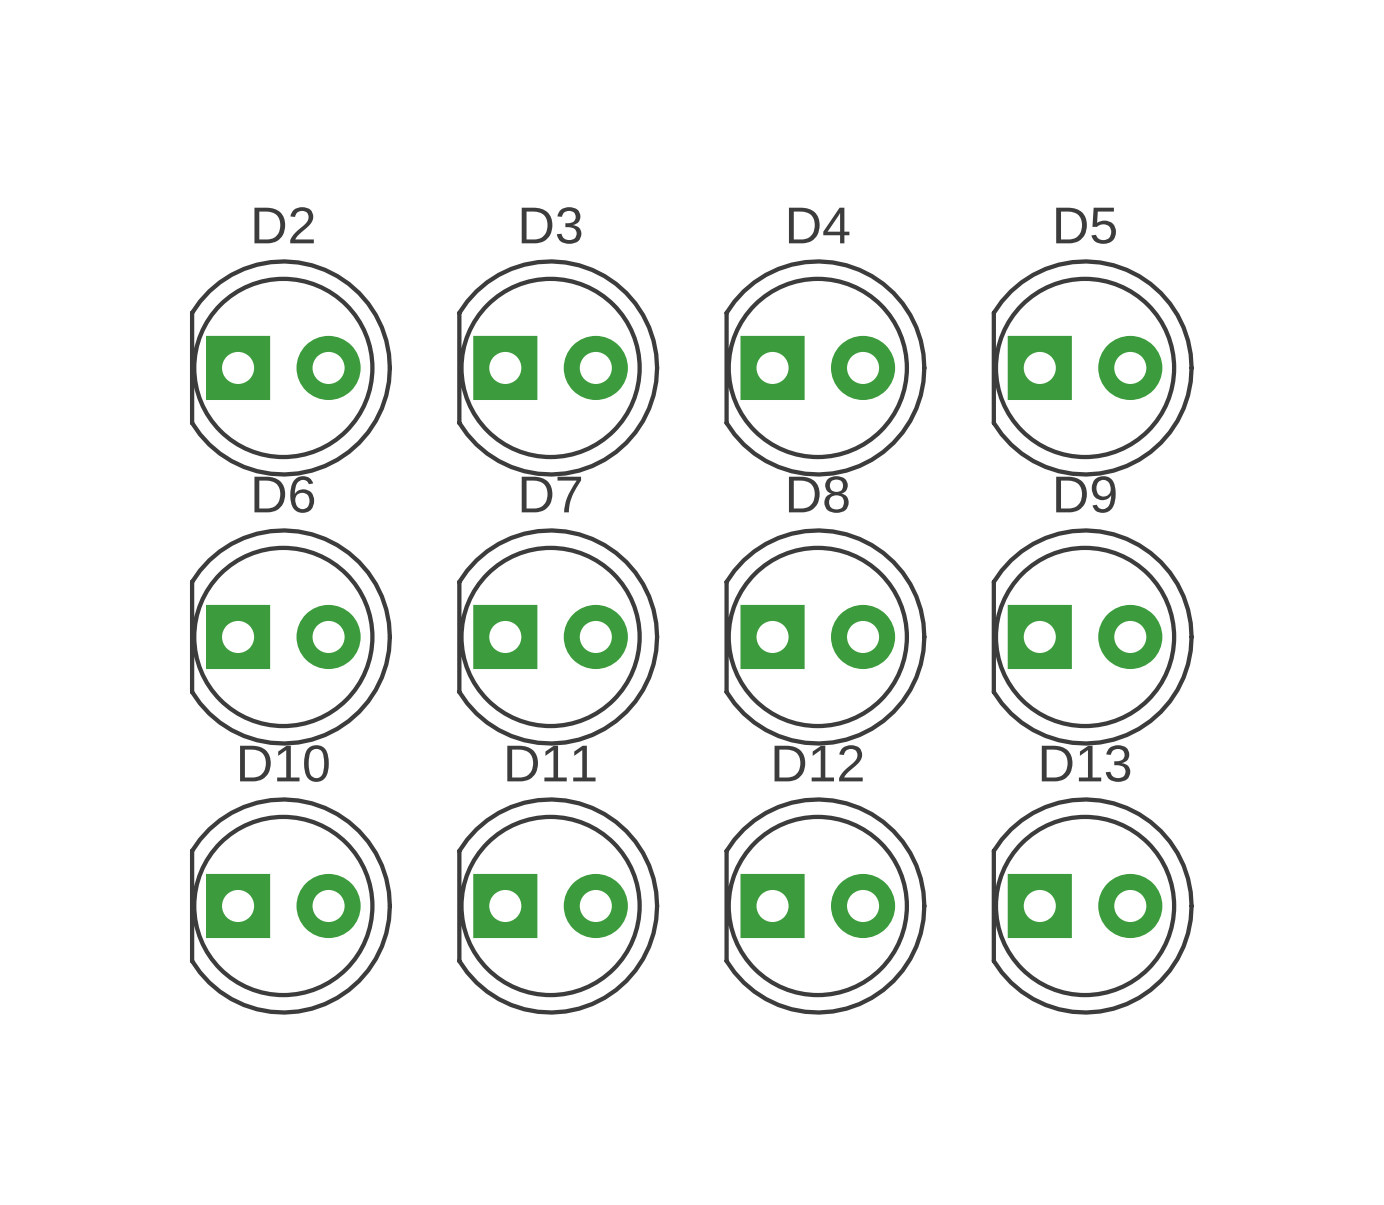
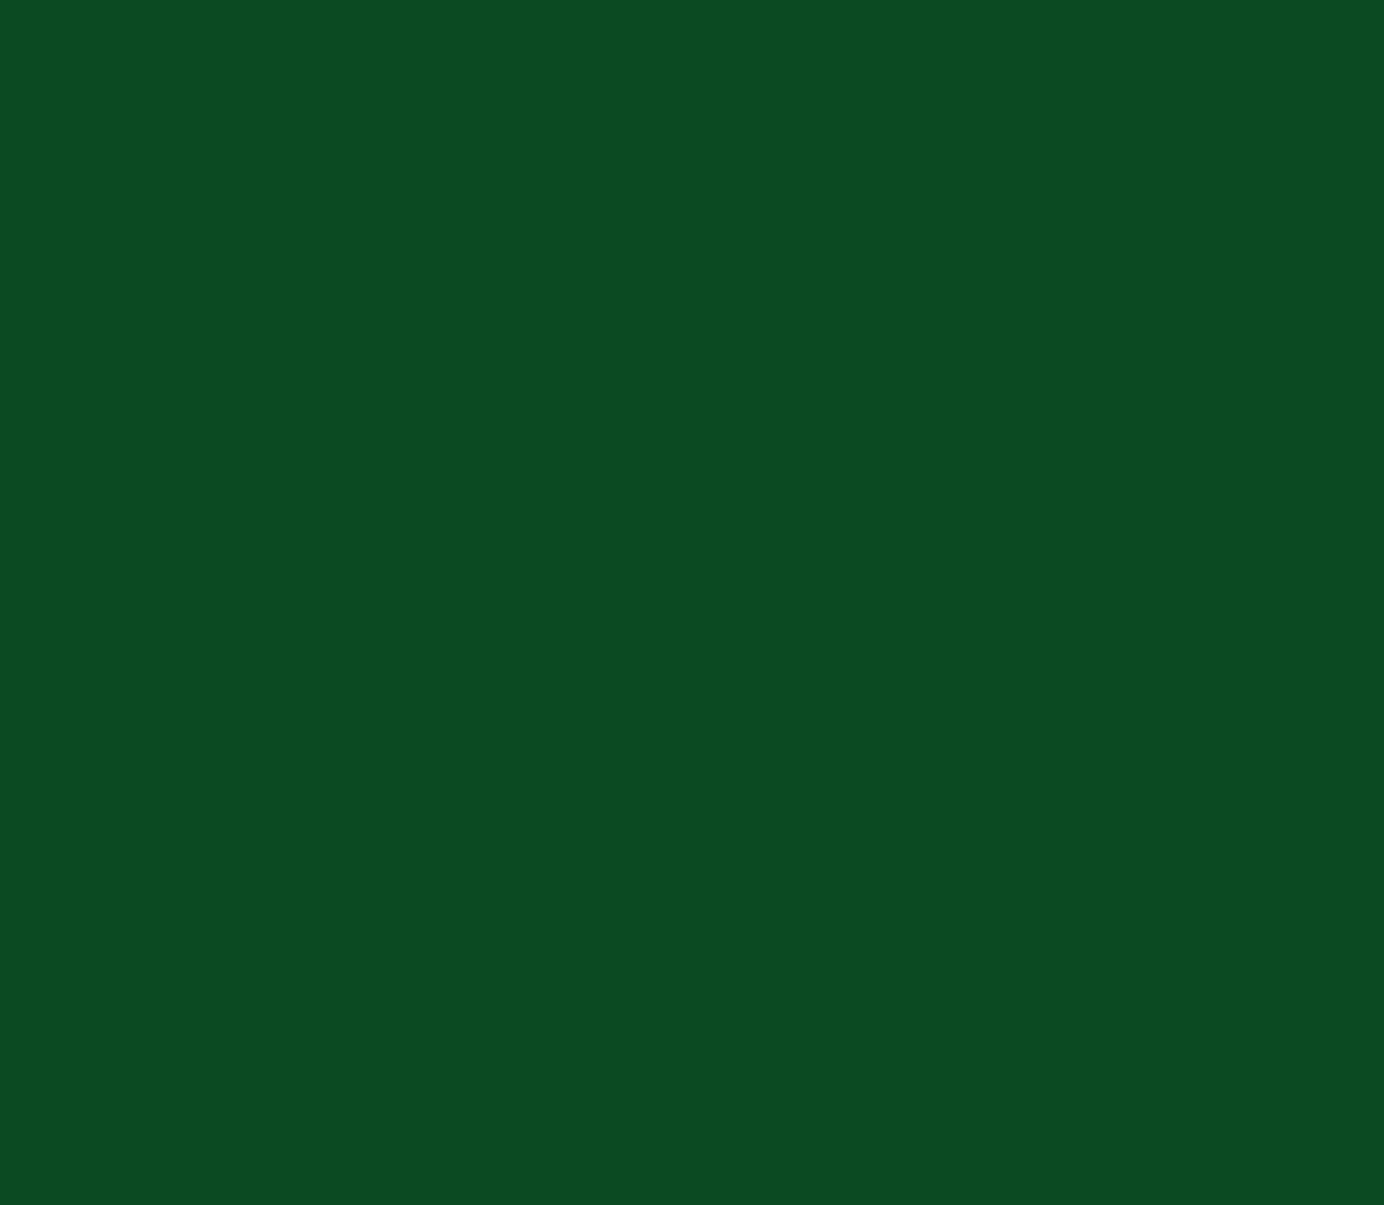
D2: (290, 367) -> none
D3: (558, 367) -> none
D4: (825, 367) -> none
D5: (1092, 367) -> none
D6: (290, 636) -> none
D7: (558, 636) -> none
D8: (825, 636) -> none
D9: (1092, 636) -> none
D10: (290, 905) -> none
D11: (558, 905) -> none
D12: (825, 905) -> none
D13: (1092, 905) -> none

